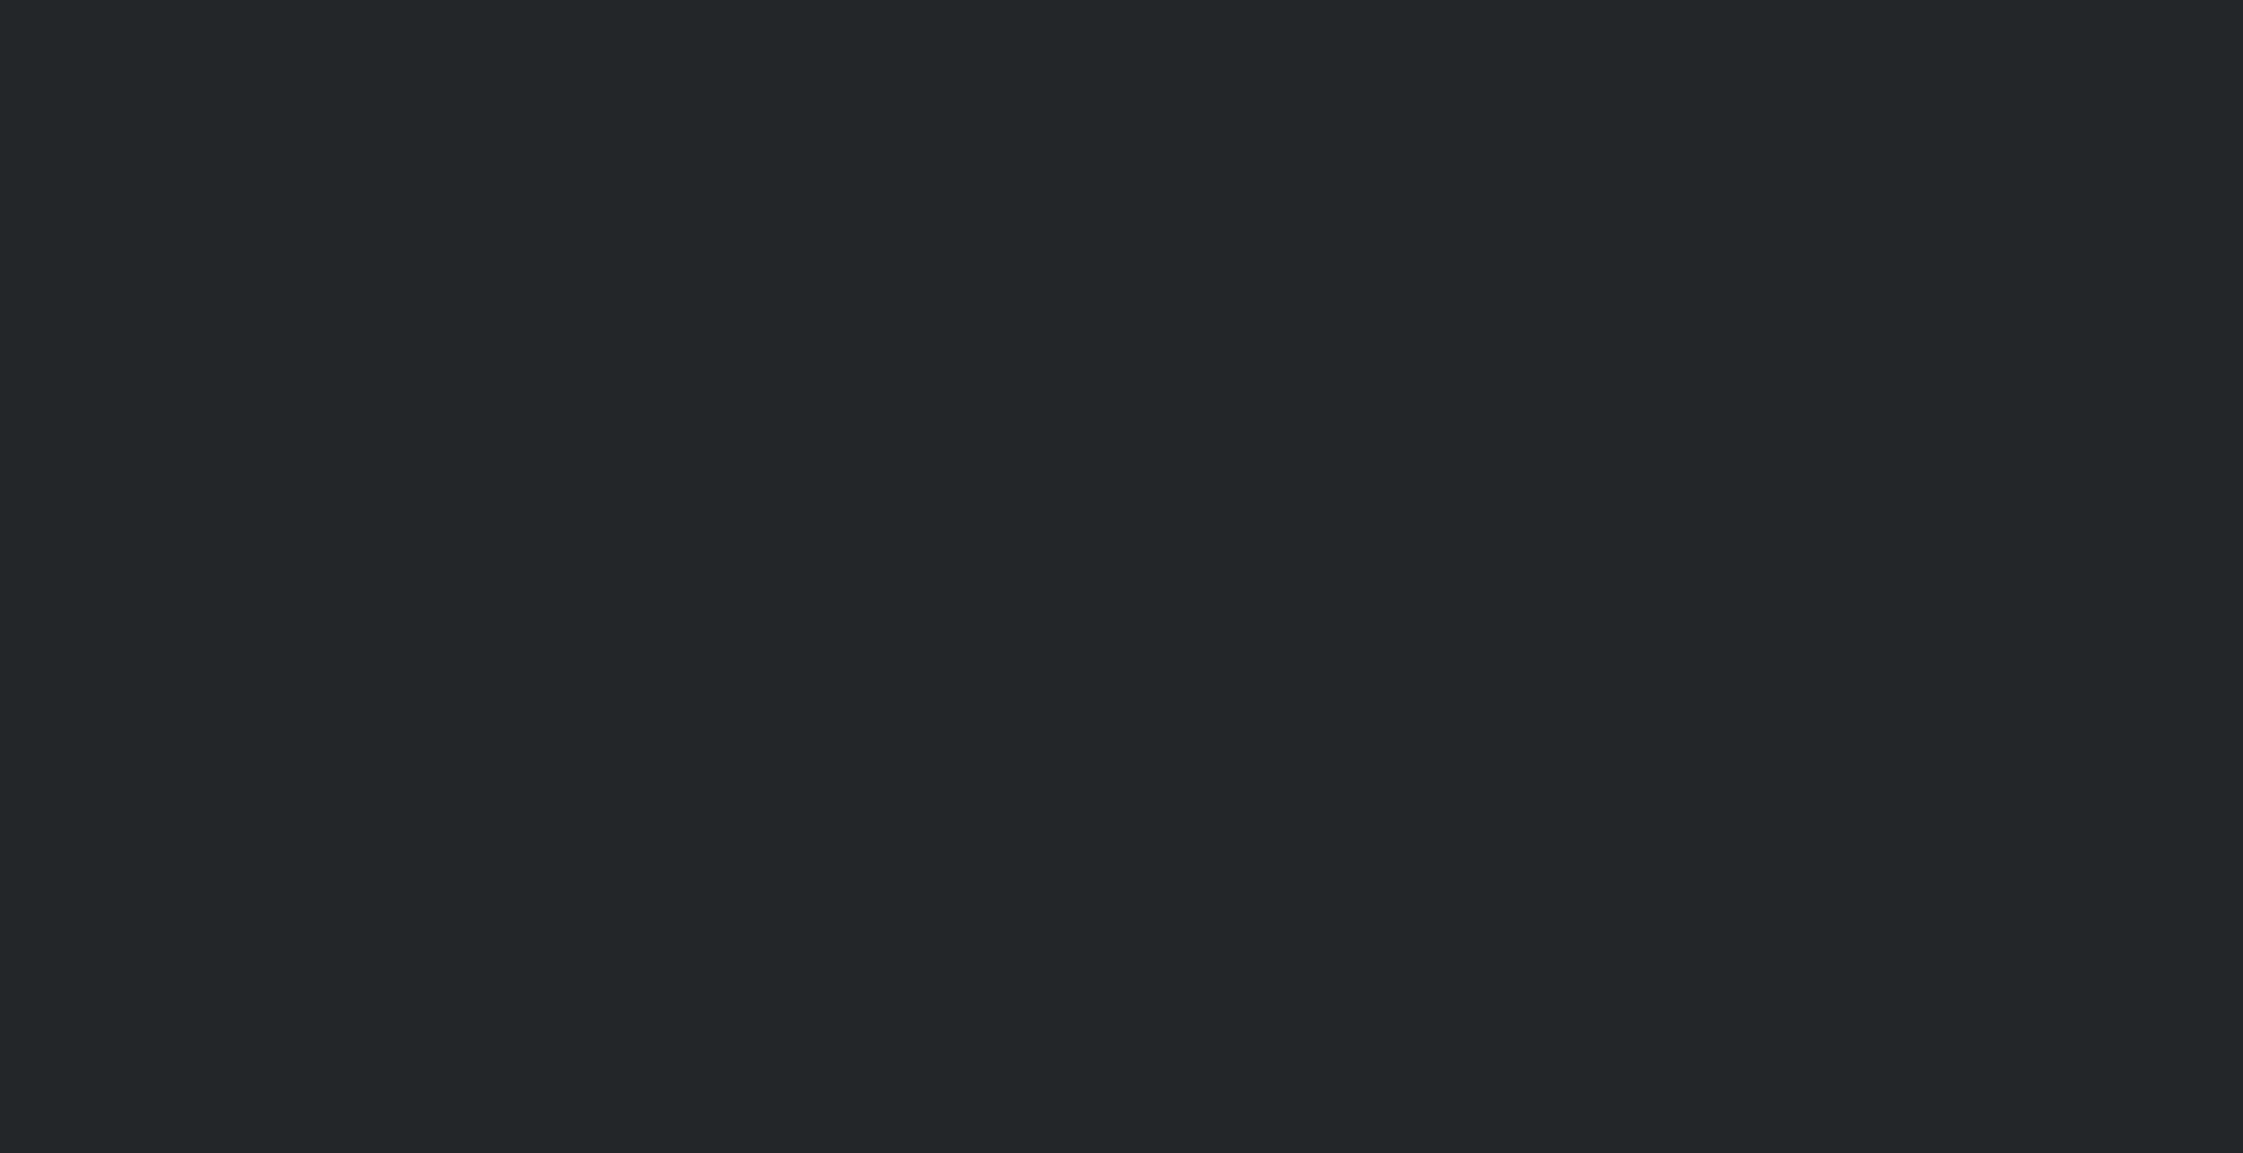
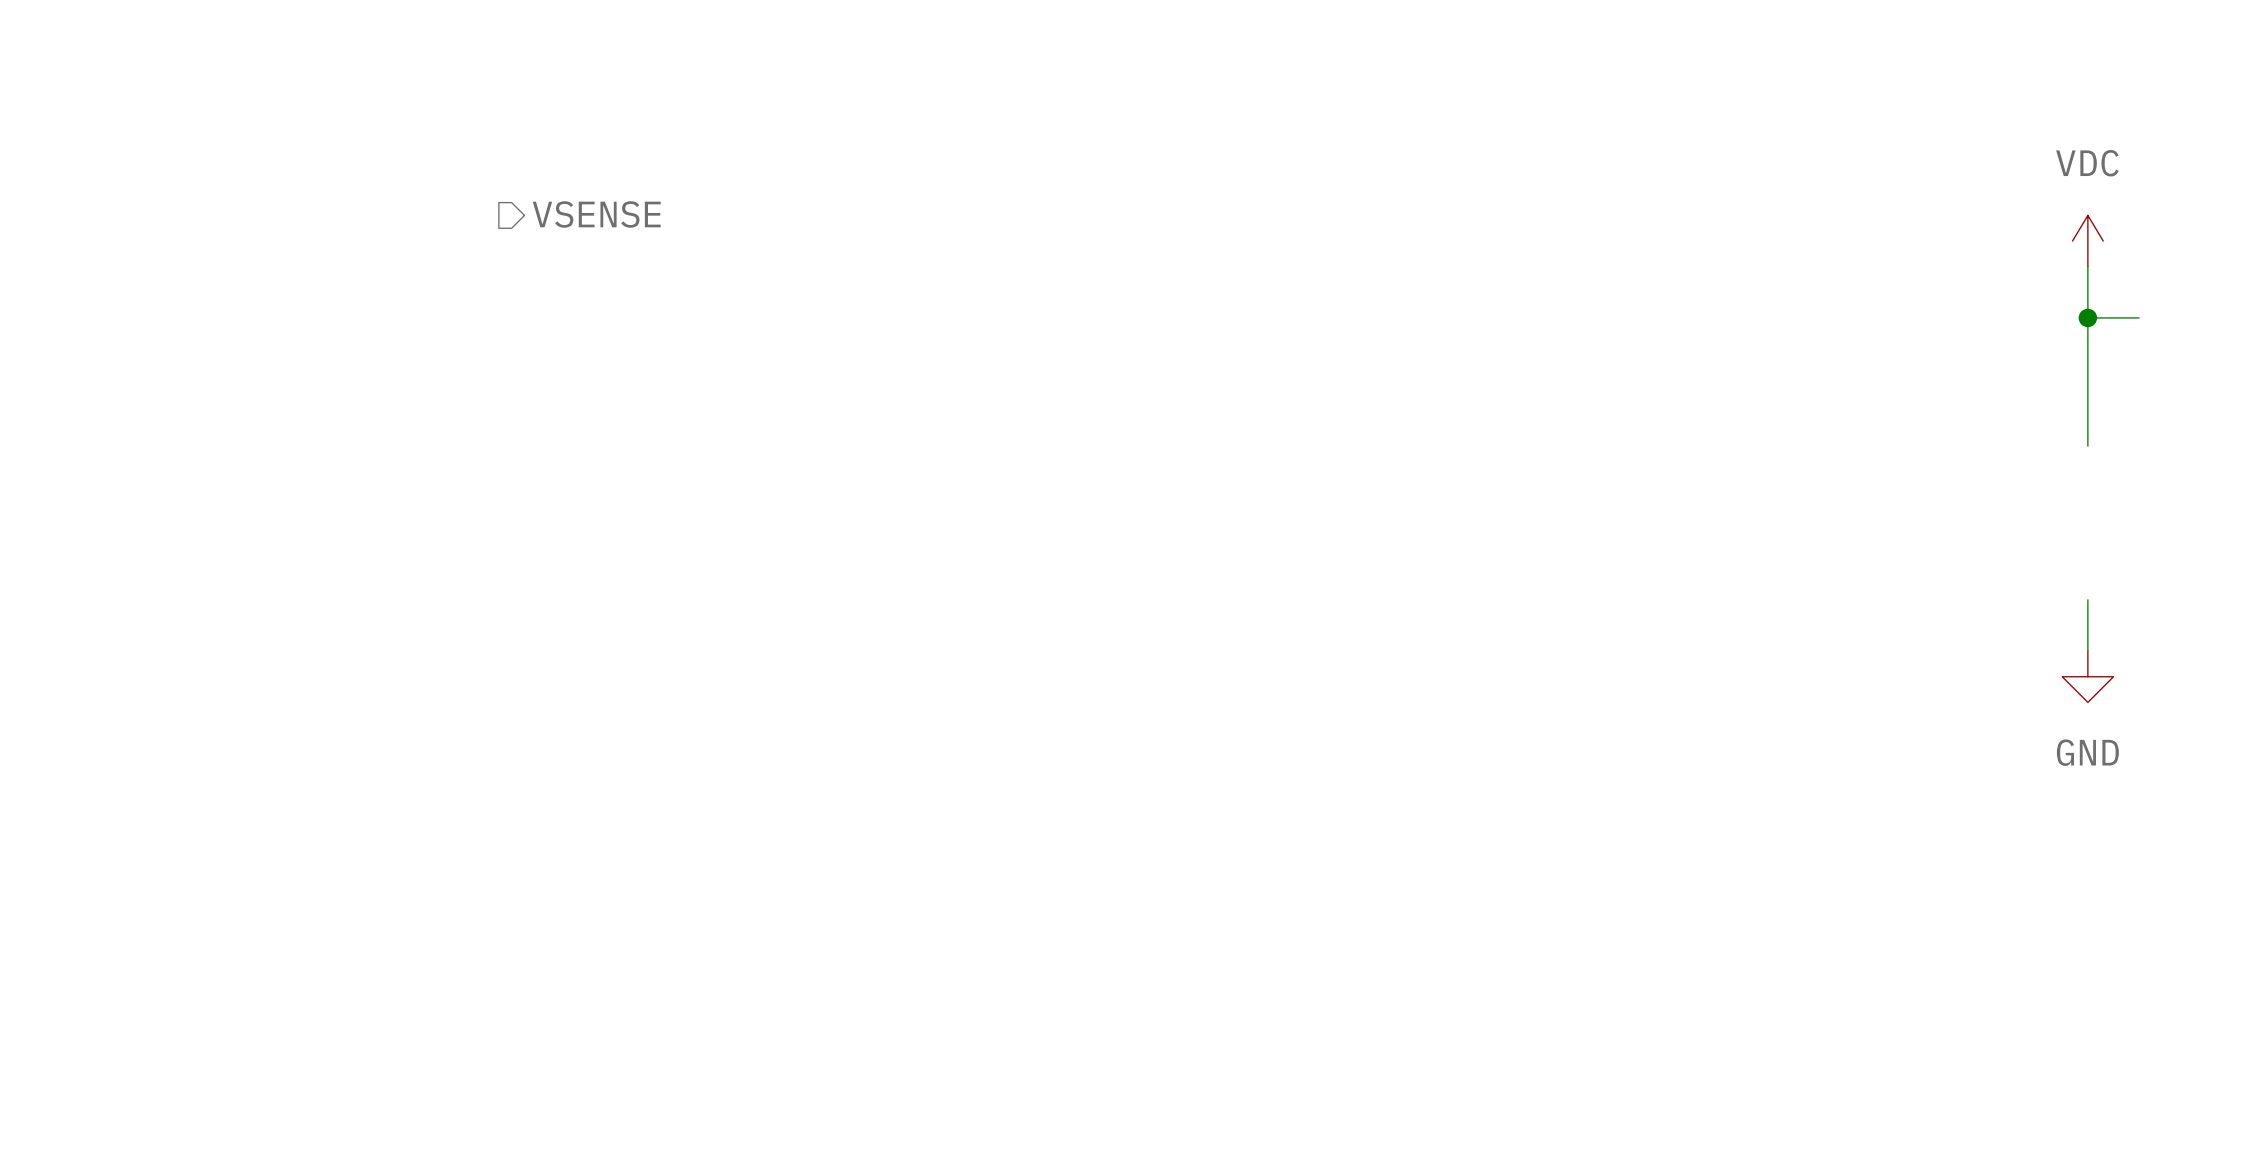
hierarchical label: none -> VSENSE (596, 214)
power symbol: none -> VDC (2087, 241)
wire: none -> (2087, 266) (2087, 446)
wire: none -> (2087, 317) (2139, 317)
junction: none -> (2087, 317)
wire: none -> (2087, 599) (2087, 651)
power symbol: none -> GND (2087, 676)

